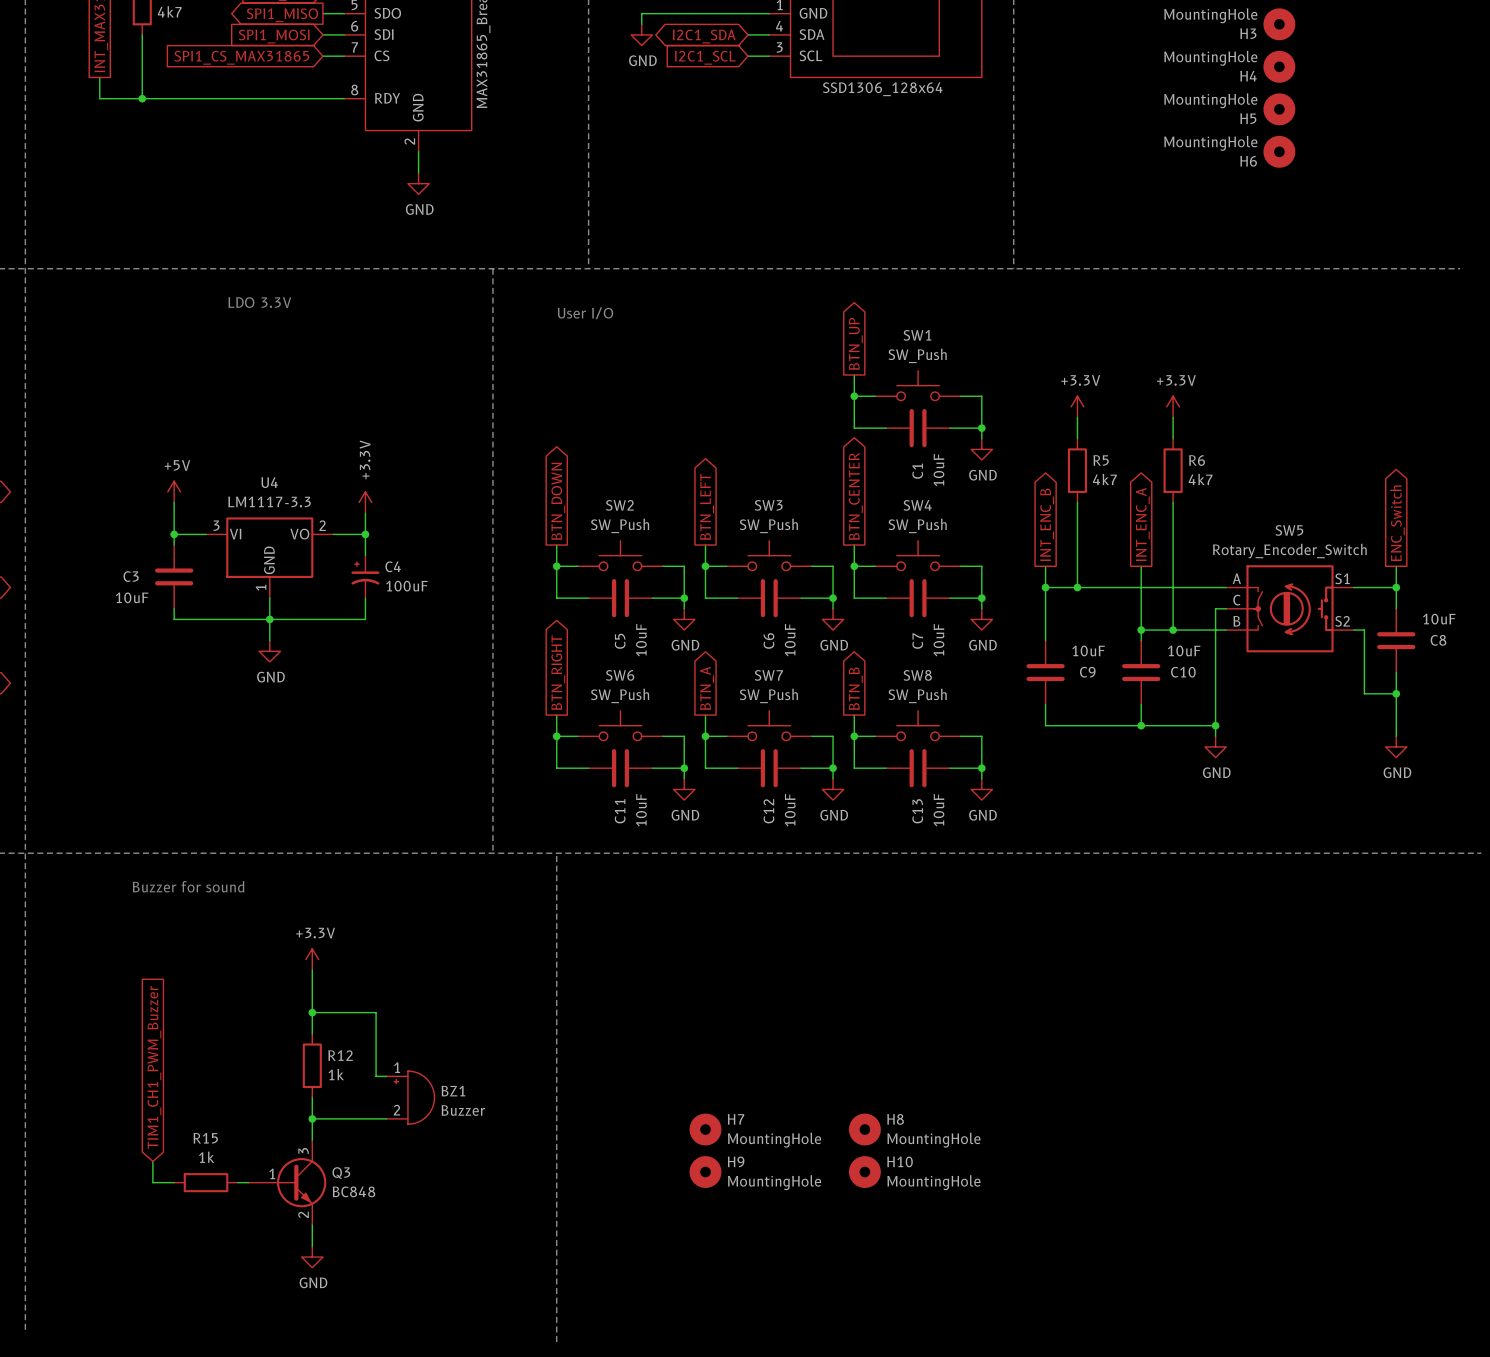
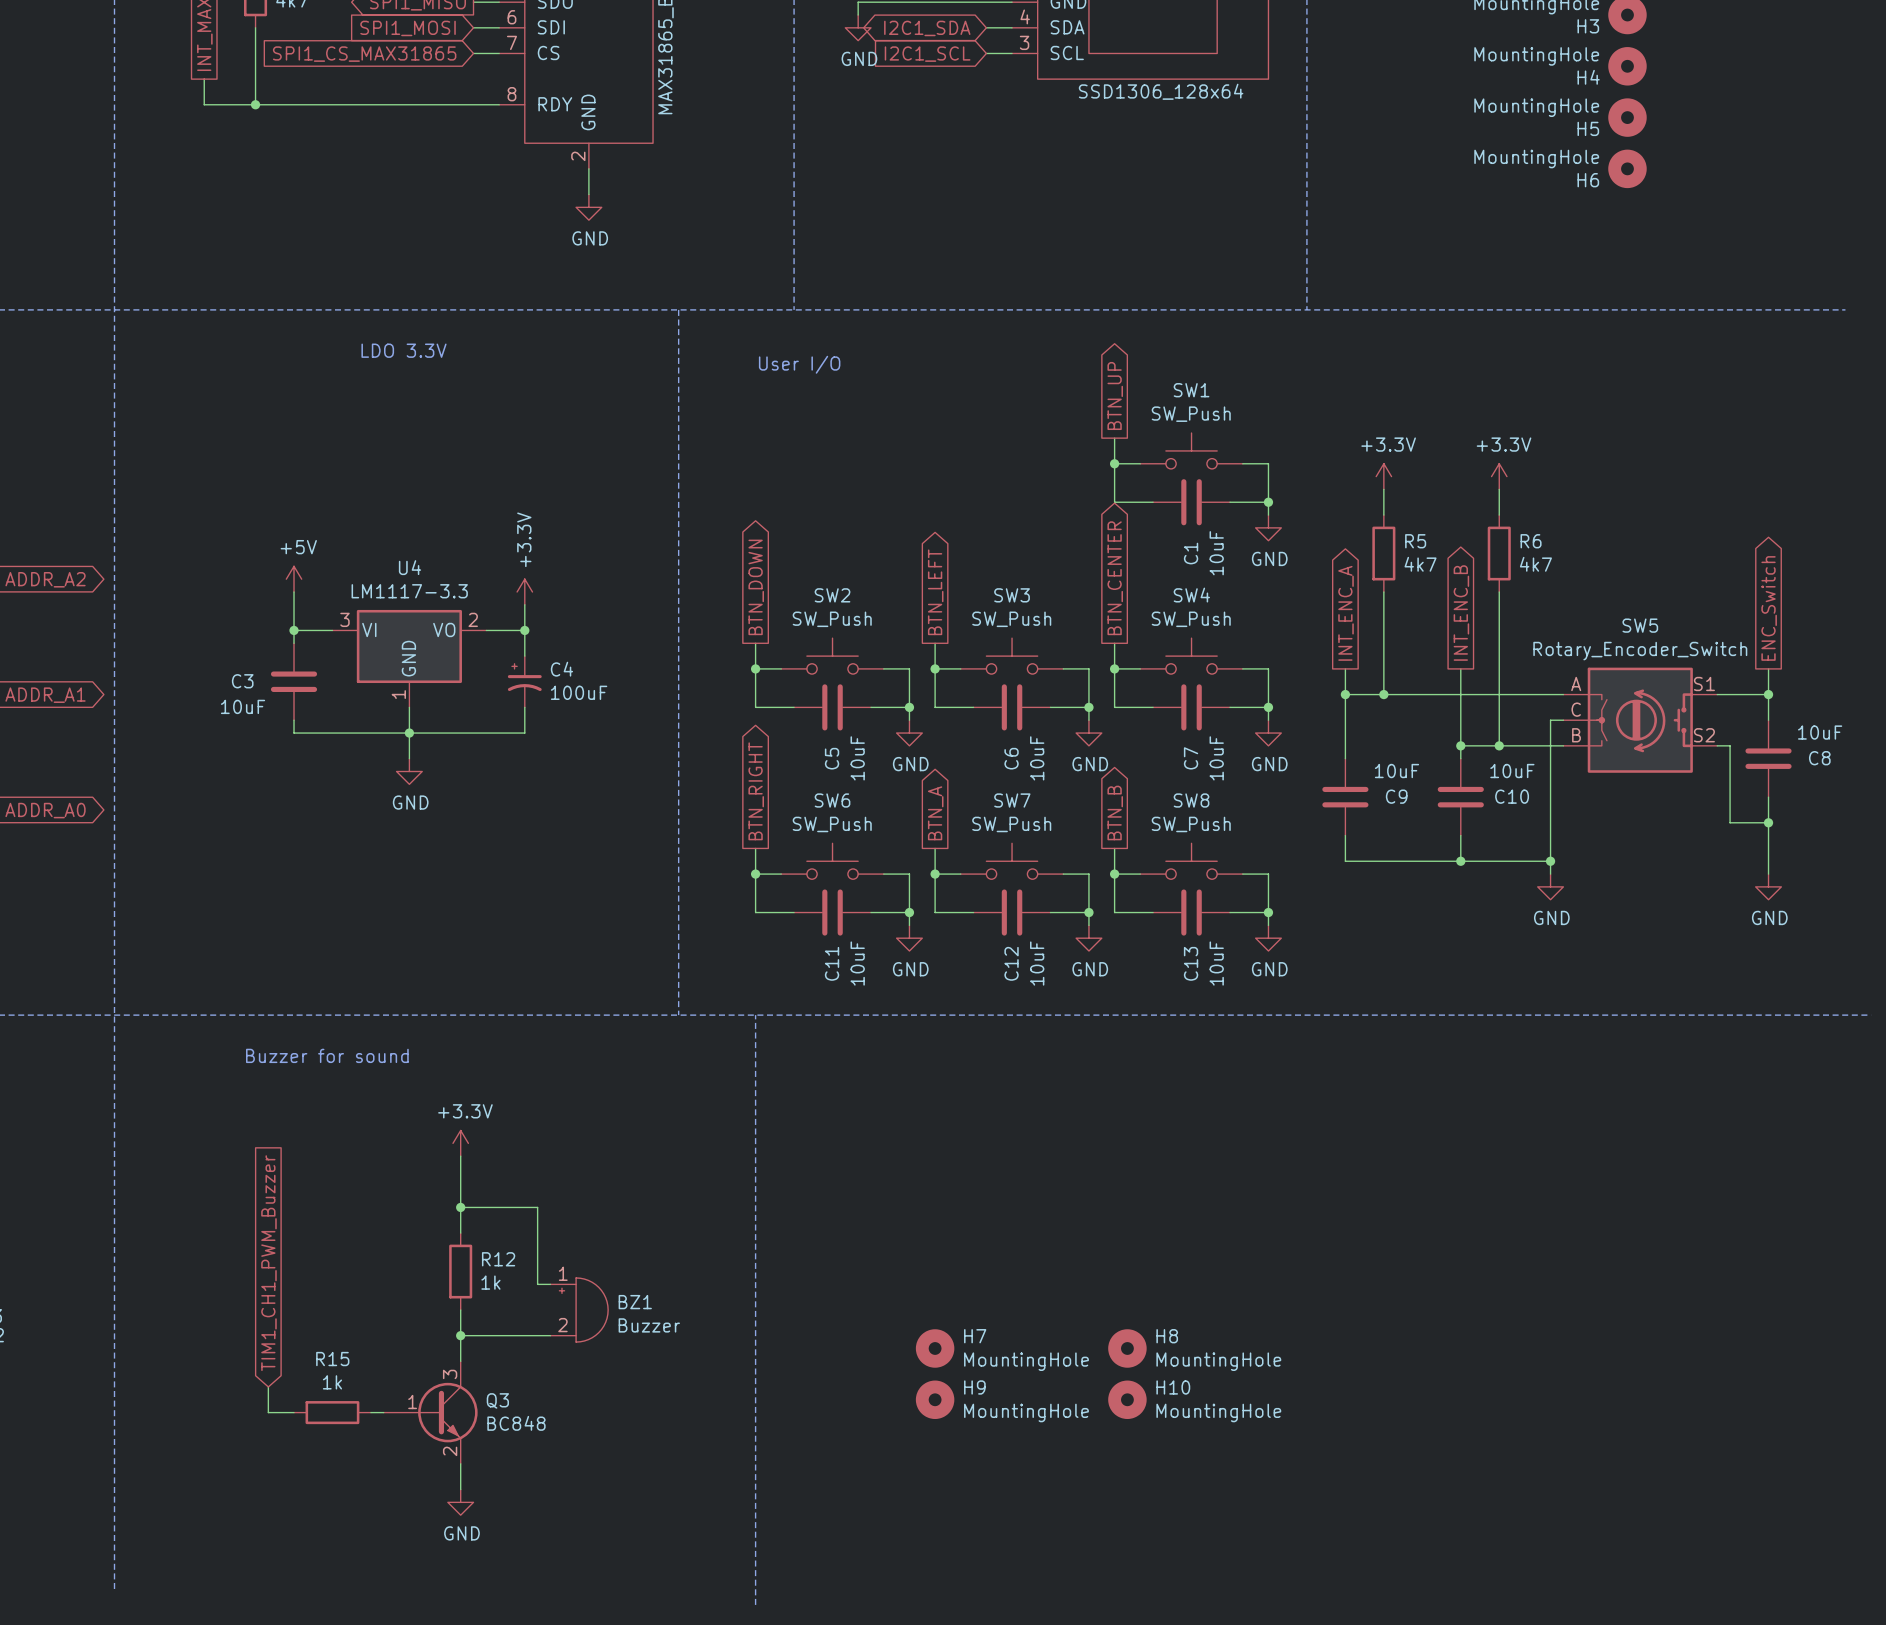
global label: INT_ENC_B (1047, 524) -> INT_ENC_A (1346, 613)
global label: INT_ENC_A (1142, 524) -> INT_ENC_B (1461, 613)

